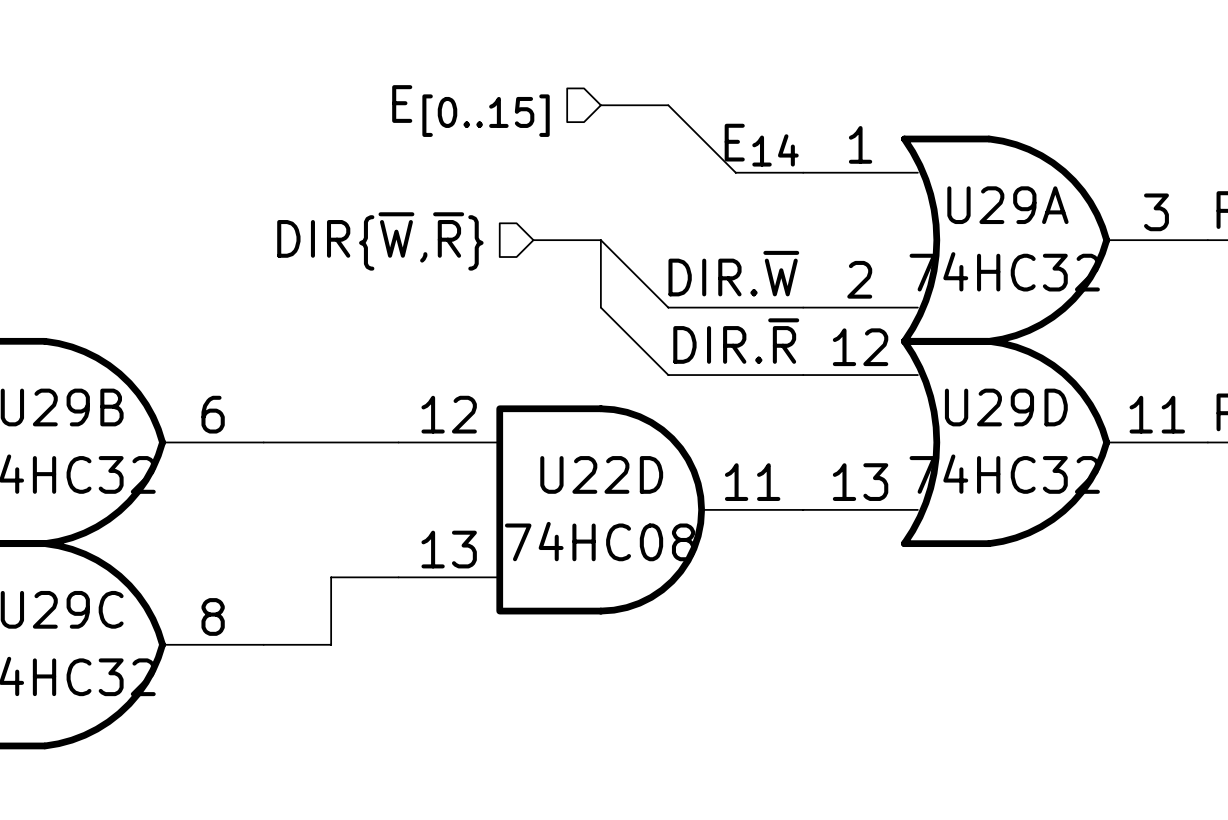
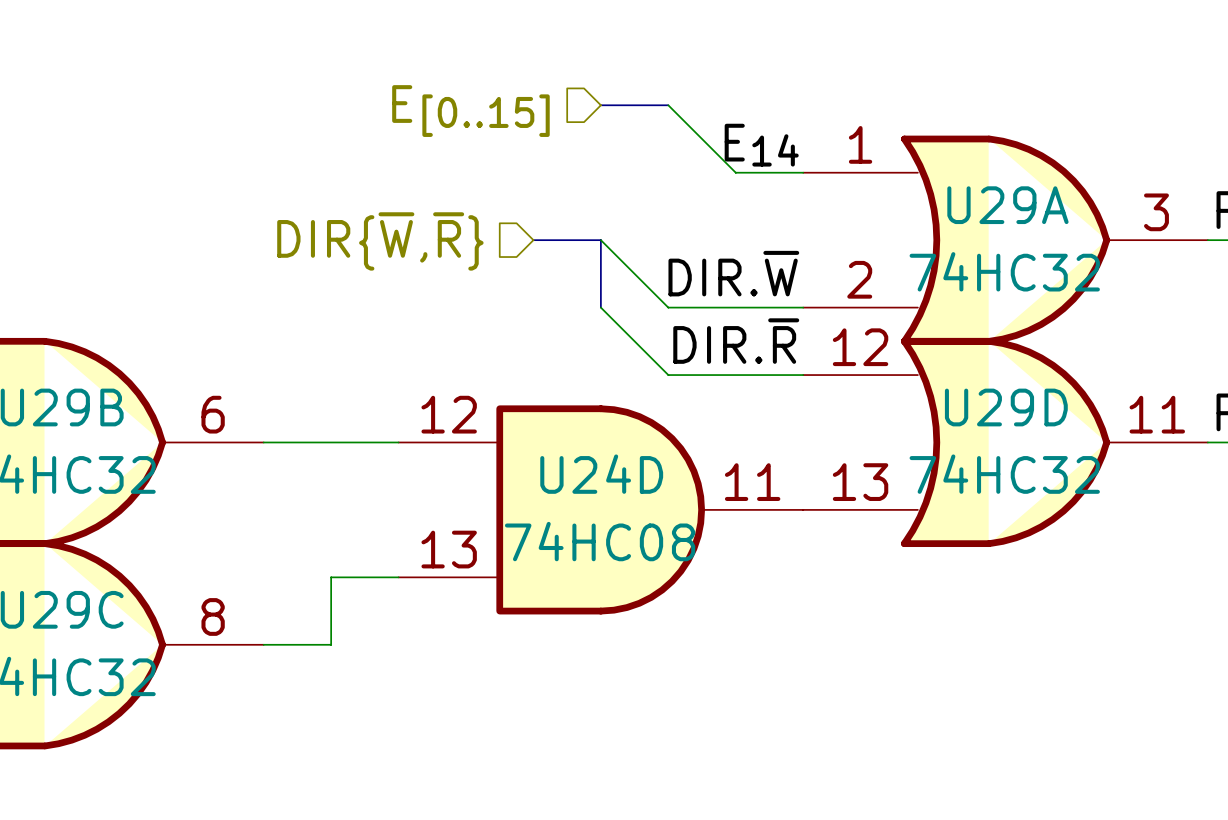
U22D name: U22D (601, 474) -> U24D (601, 474)

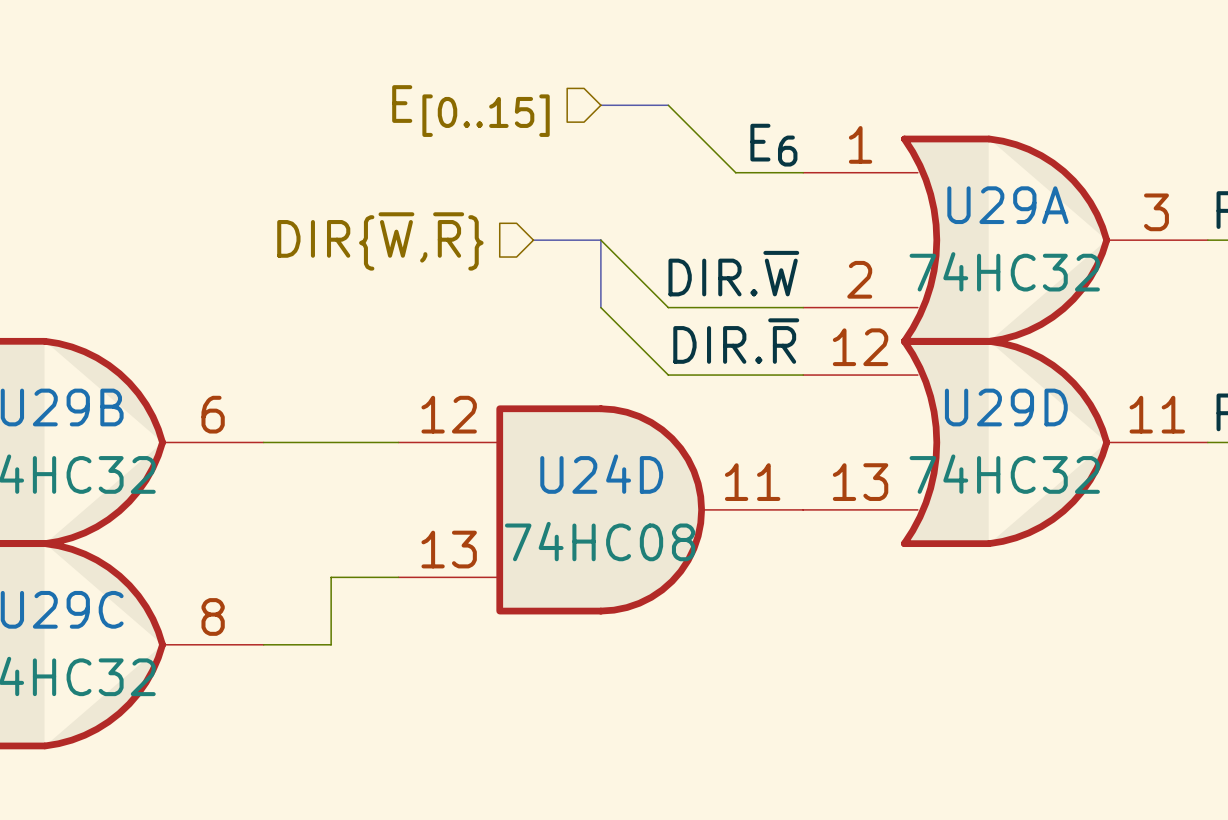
label: E14 (761, 145) -> E6 (773, 145)

